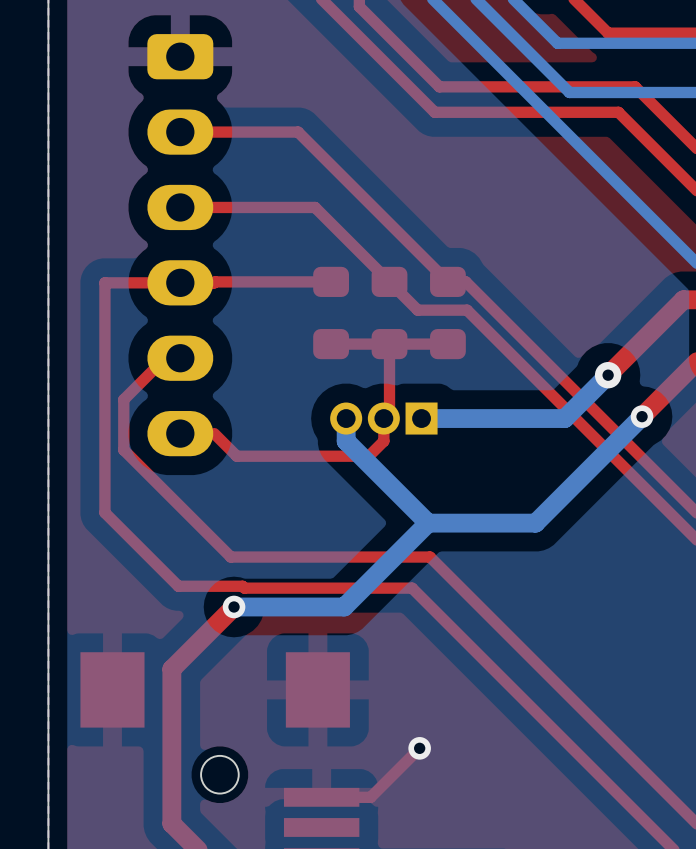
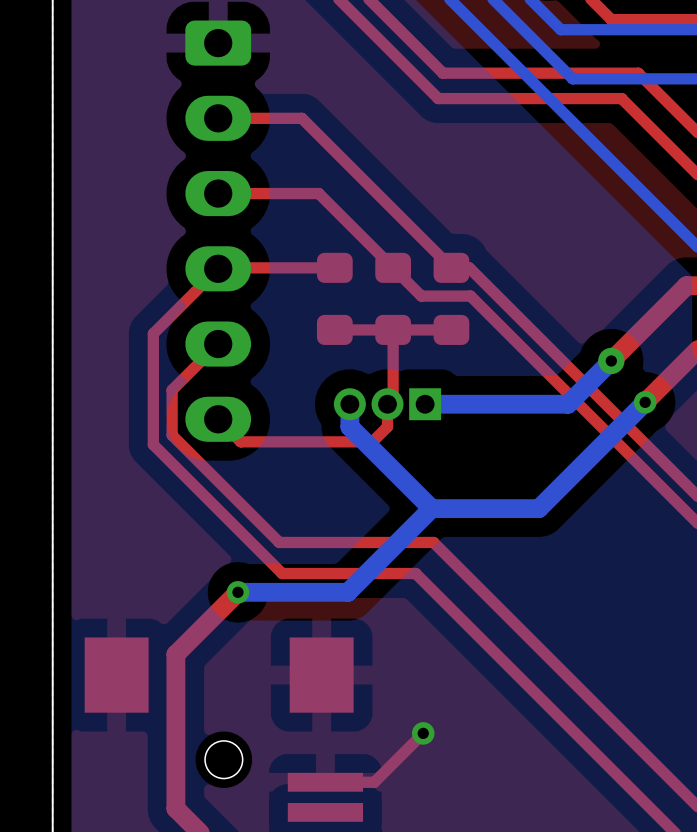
part position: (180, 245) -> (218, 231)
top track: (214, 282) (104, 282) (104, 512) (178, 586) (278, 588) -> (218, 268) (153, 333) (153, 444) (282, 573)
top track: (180, 358) (165, 358) (123, 399) (123, 450) (230, 557) (275, 557) -> (218, 344) (172, 390) (172, 435) (279, 542)

